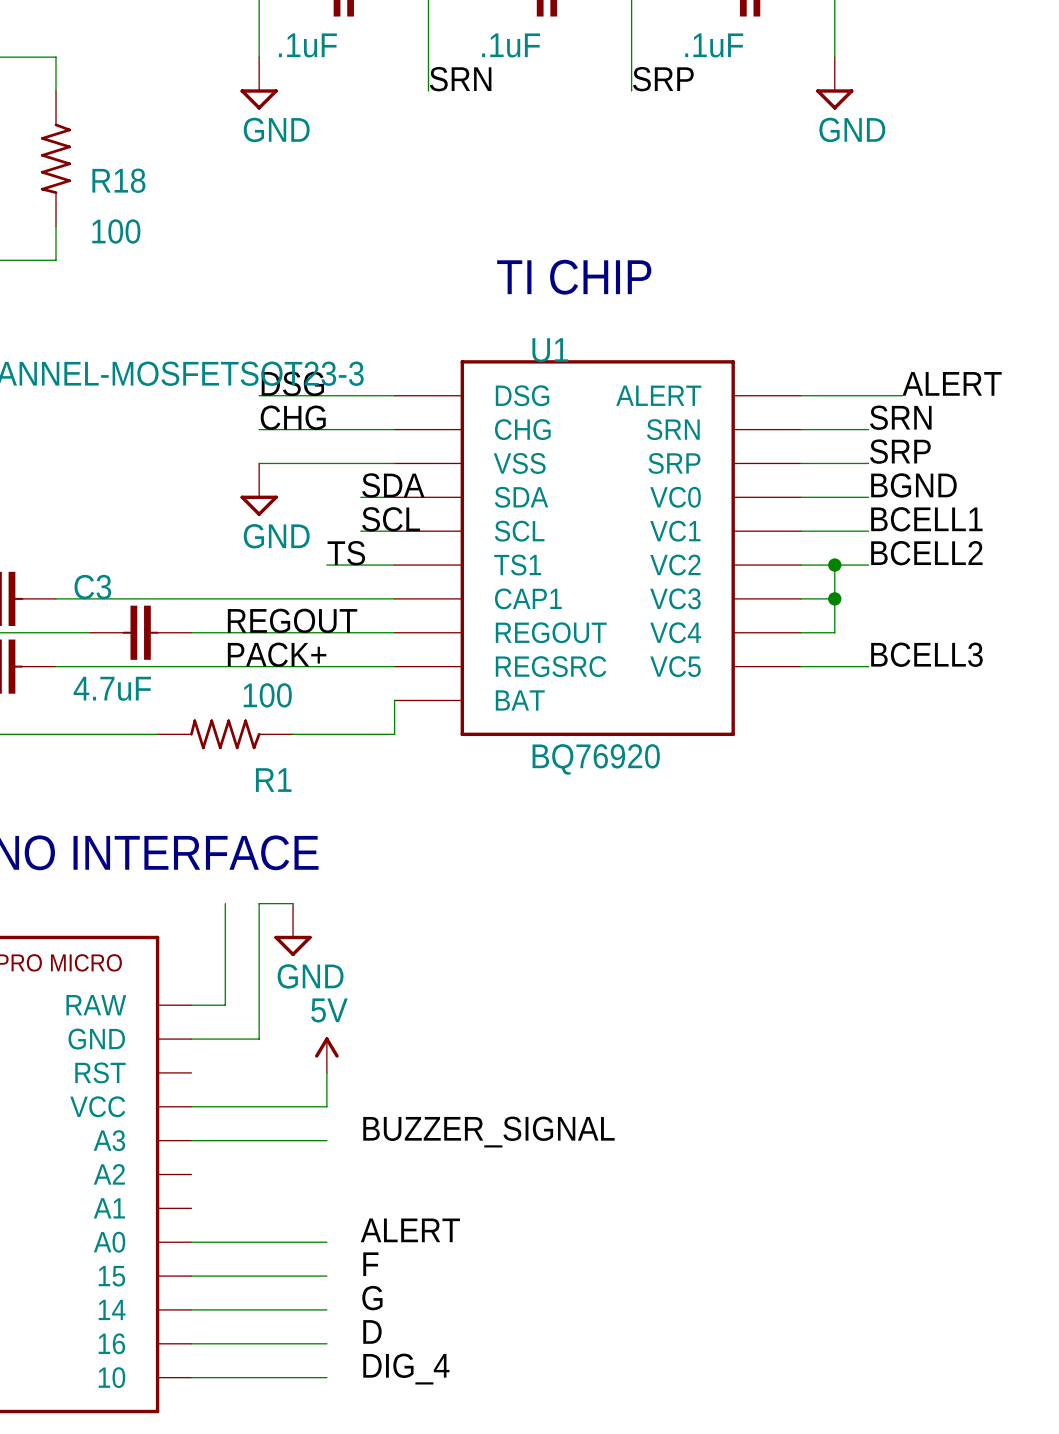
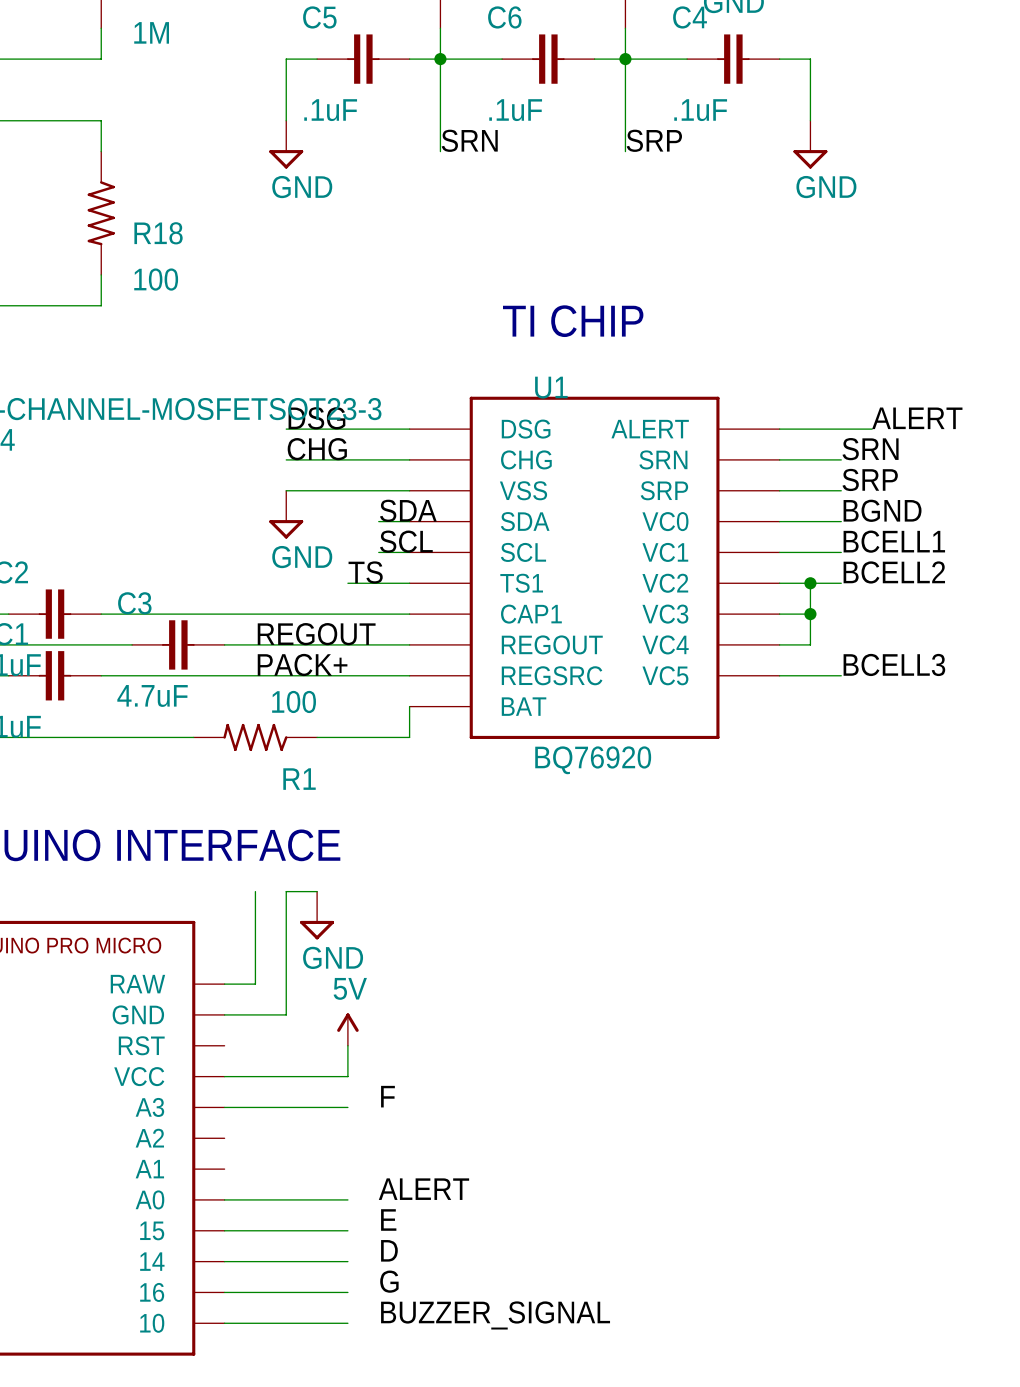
label: BUZZER_SIGNAL (488, 1132) -> F (387, 1096)
label: F (370, 1264) -> E (388, 1219)
label: G (372, 1298) -> D (389, 1250)
label: D (372, 1331) -> G (389, 1281)
label: DIG_4 (406, 1369) -> BUZZER_SIGNAL (495, 1315)

